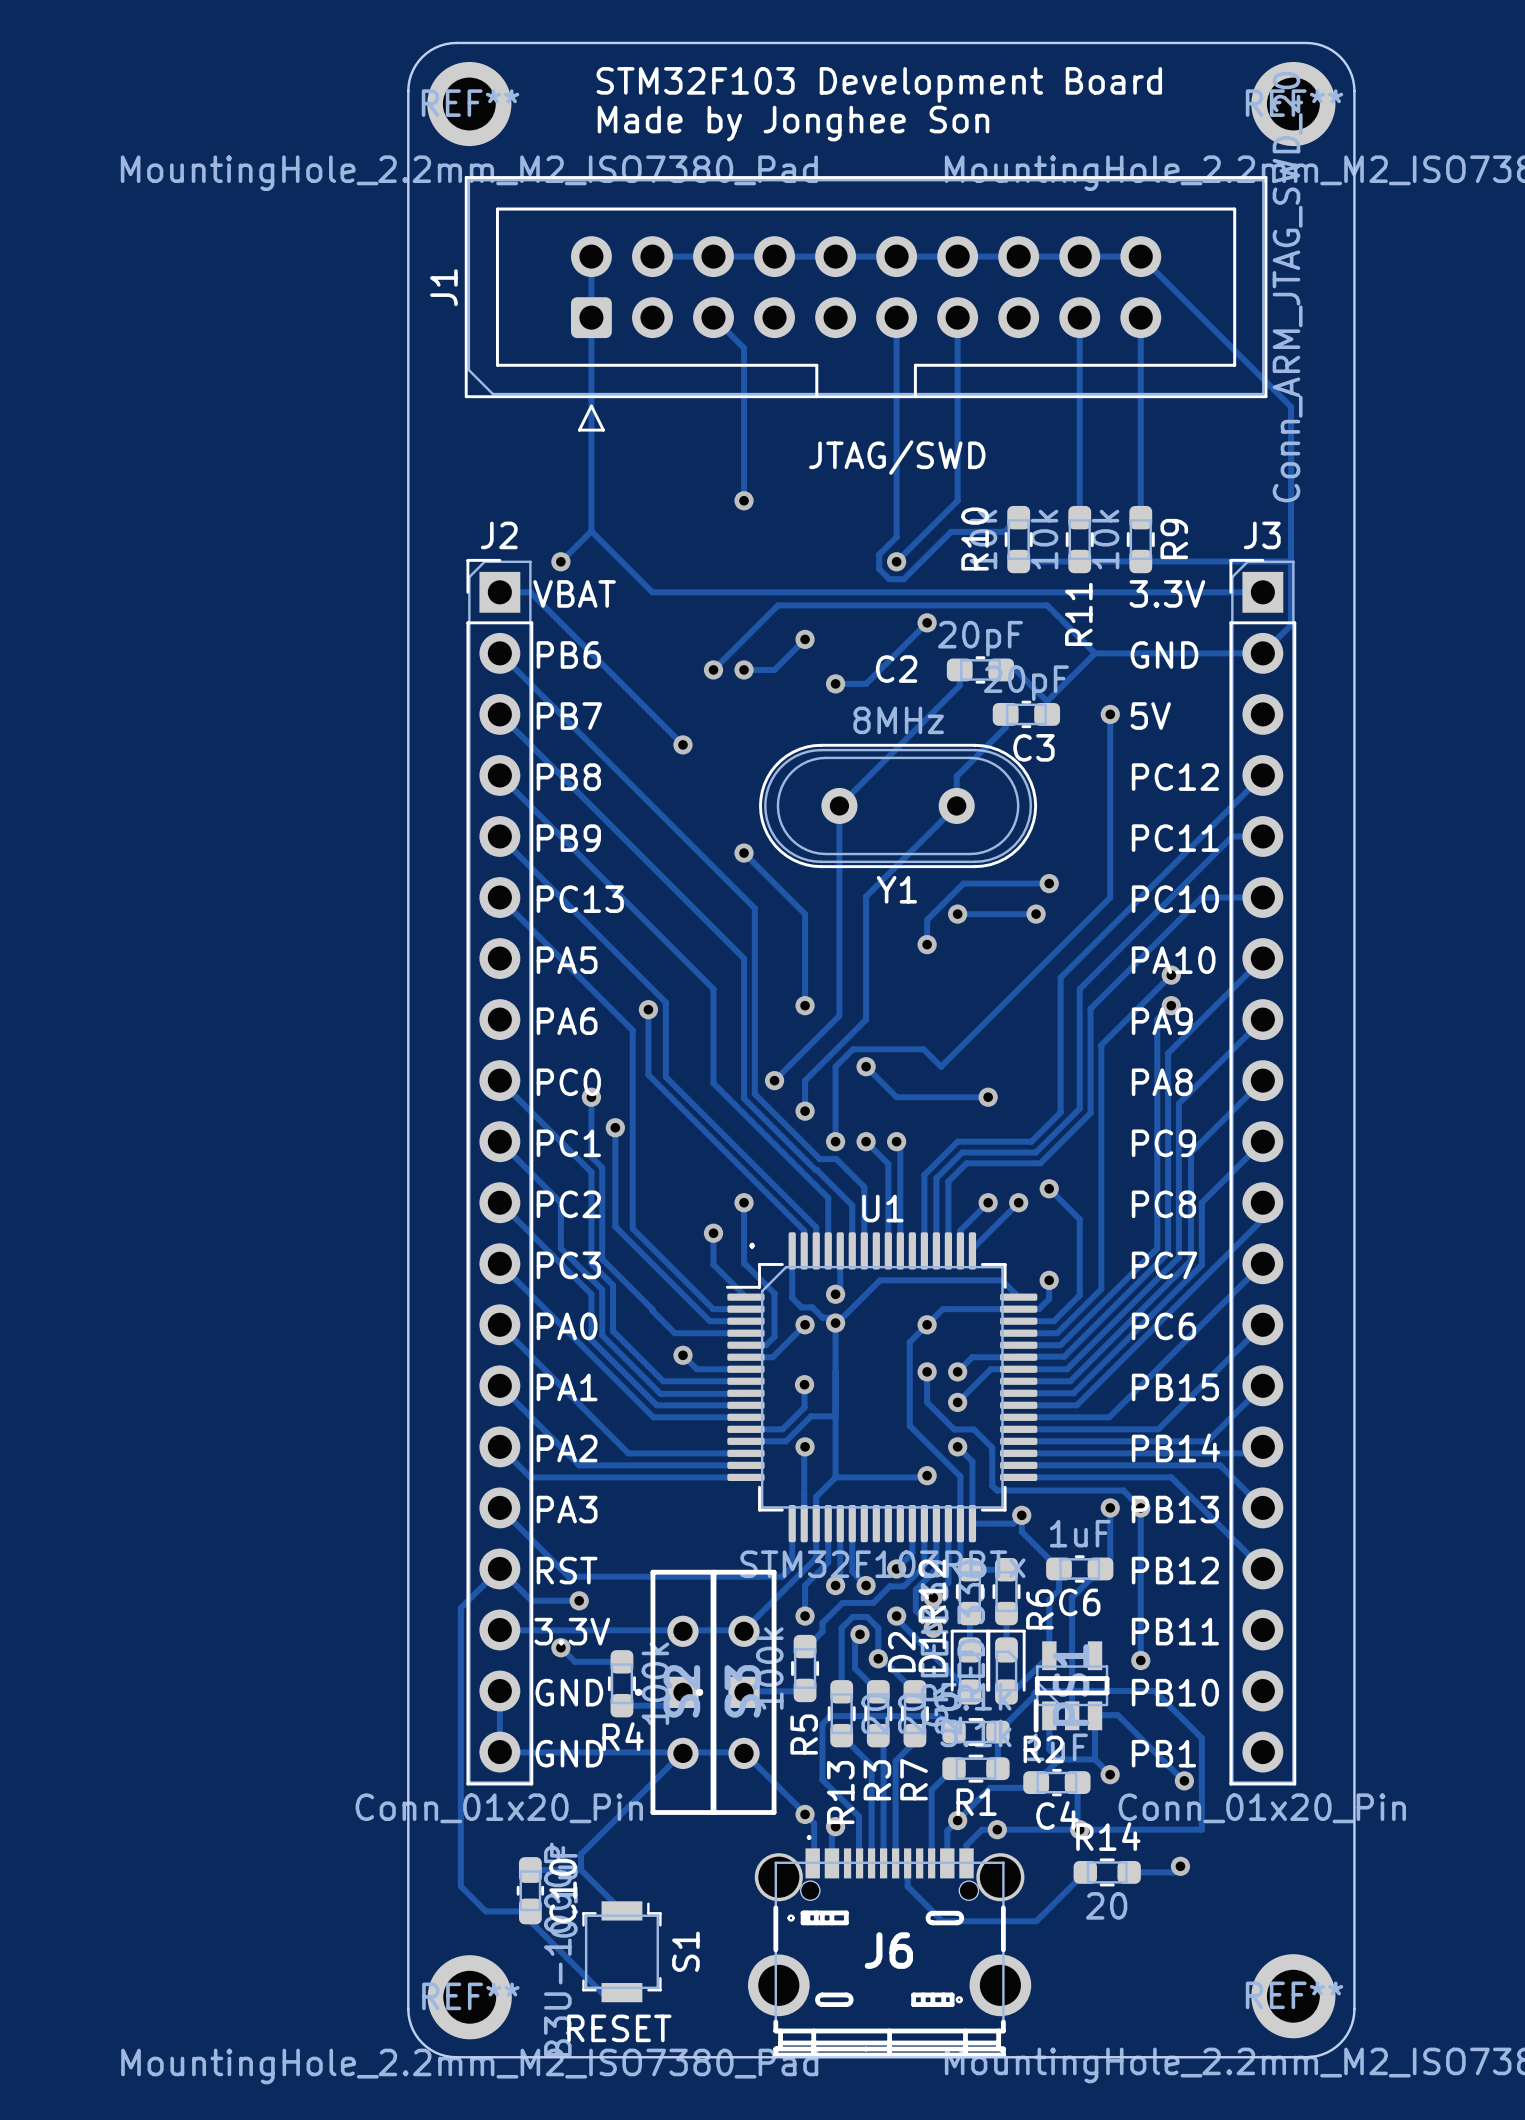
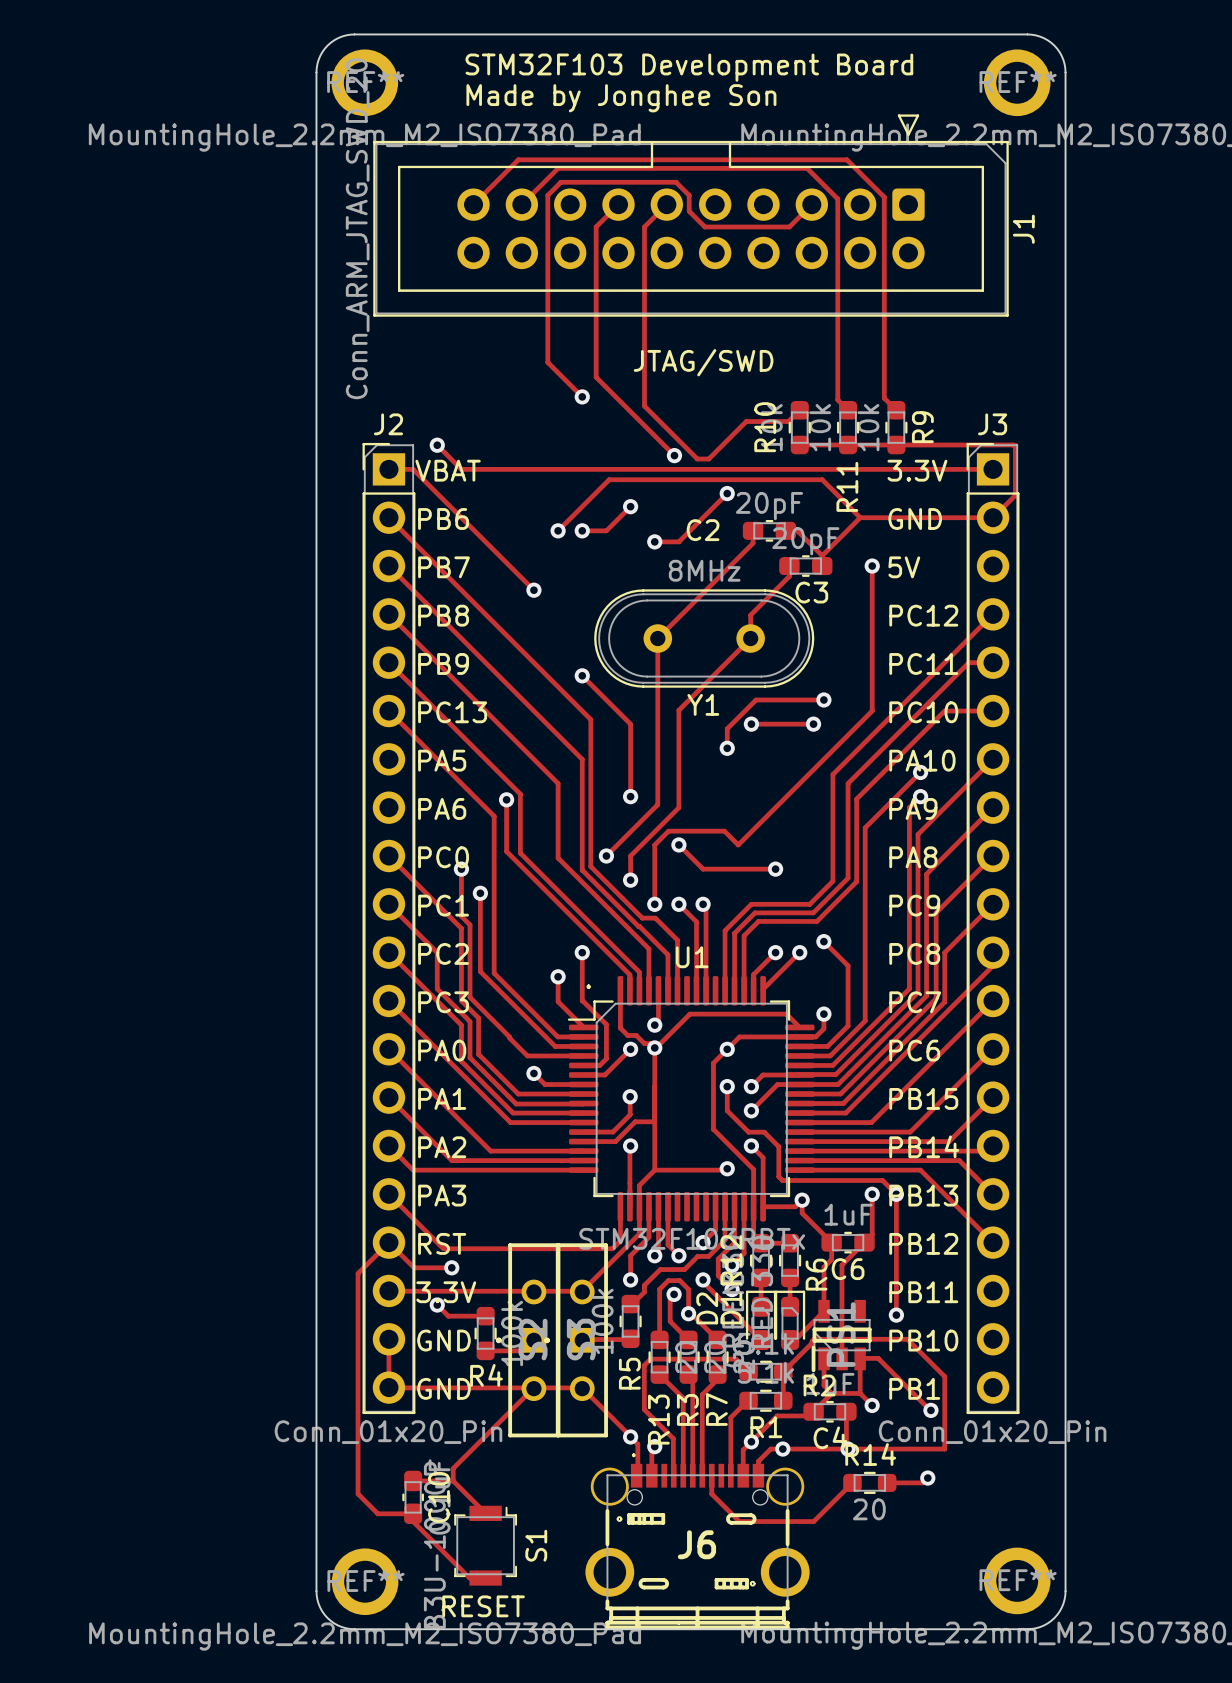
track: (591, 256) (591, 531) -> none
track: (652, 256) (1140, 256) (1291, 406) (1291, 561) -> none
track: none -> (618, 204) (596, 226) (596, 377) (674, 455)
J1 rotation: 0° (866, 303) -> 180° (691, 215)
track: (713, 317) (744, 348) (744, 500) -> (811, 204) (789, 226) (704, 226) (689, 211) (689, 195) (676, 182) (560, 182) (547, 195) (547, 362) (582, 396)
track: (896, 317) (896, 537) (879, 554) (879, 569) -> (666, 204) (644, 226) (644, 406) (689, 450)
track: (957, 317) (957, 500) (896, 561) -> none
track: (1079, 317) (1079, 517) -> (521, 204) (558, 168) (807, 168) (837, 198) (837, 399) (848, 410)
track: (1140, 317) (1140, 517) -> (473, 204) (518, 159) (846, 159) (884, 197) (884, 398) (896, 410)
track: (591, 531) (652, 592) -> (437, 445) (461, 469) (509, 469)
track: (591, 531) (560, 561) -> none
via position: (896, 561) -> (674, 455)

